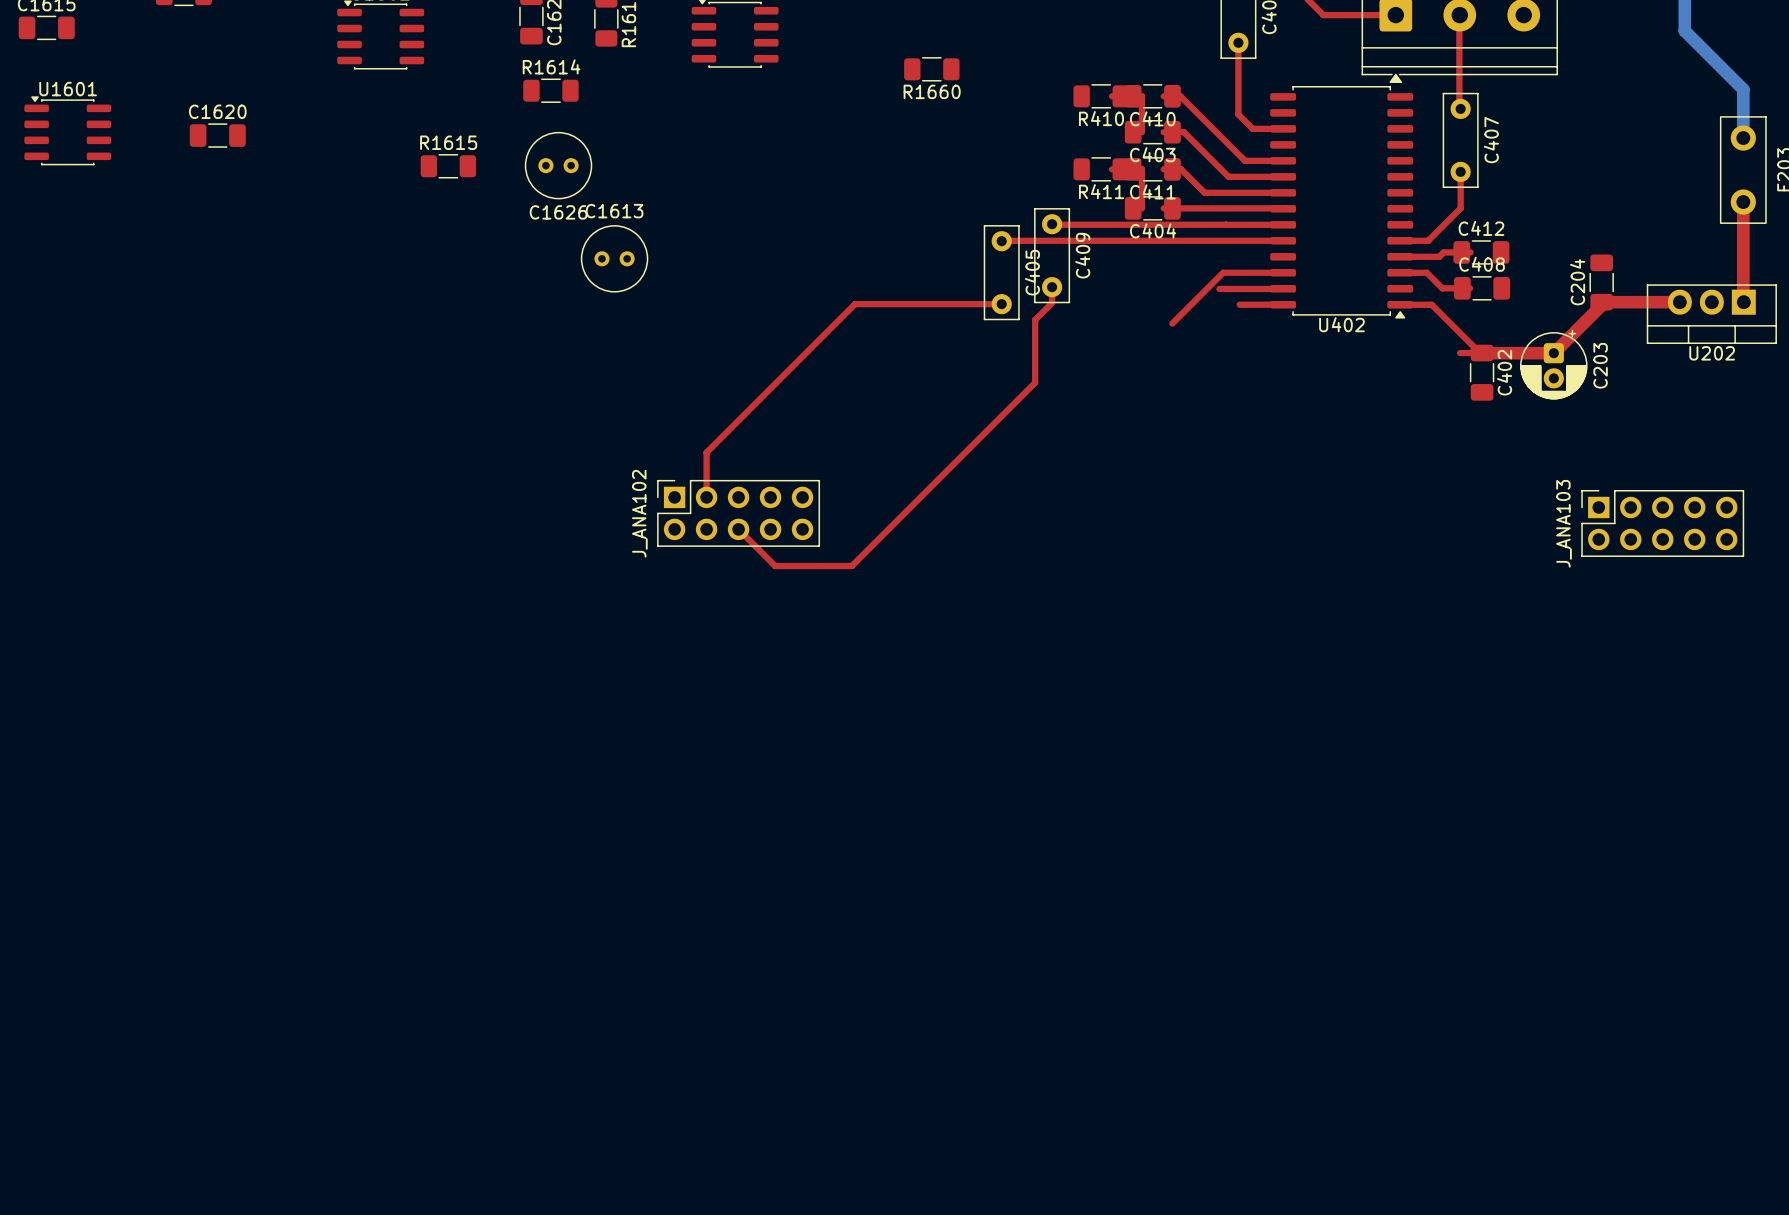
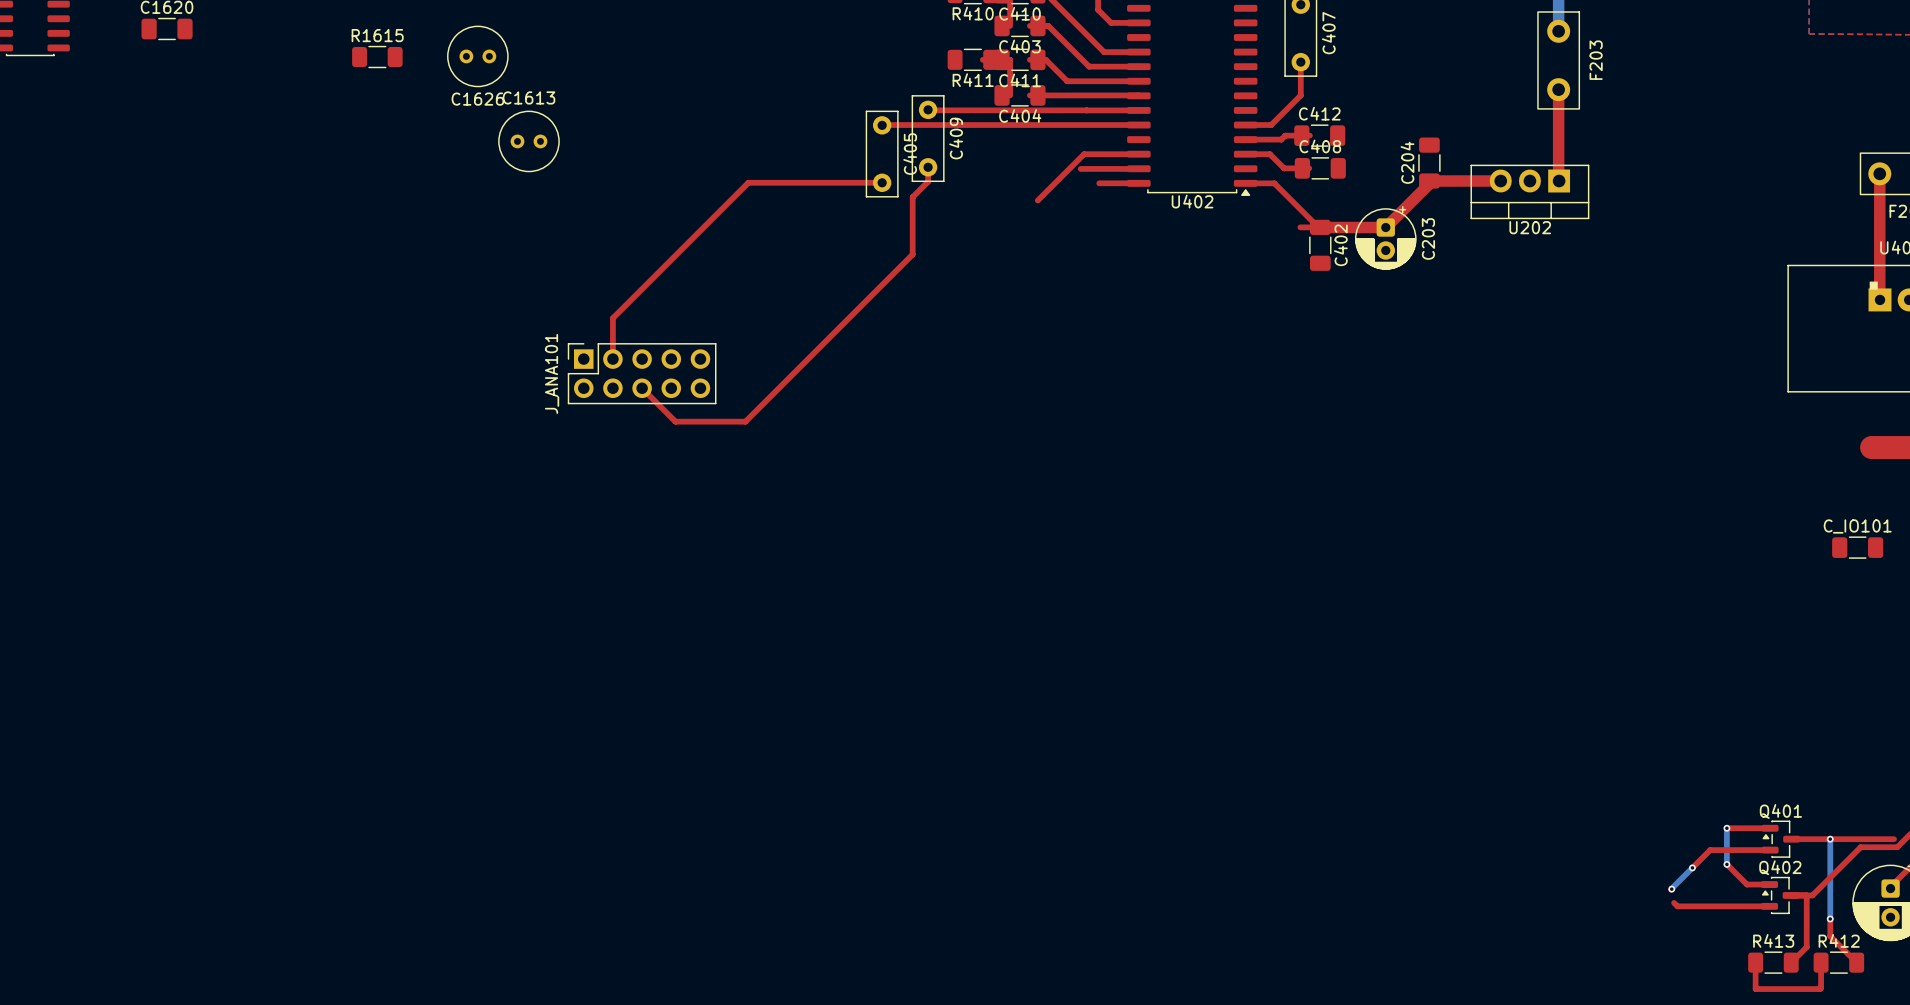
J_ANA102 name: J_ANA102 (639, 513) -> J_ANA101 (552, 373)
J_ANA103: (1662, 523) -> none

